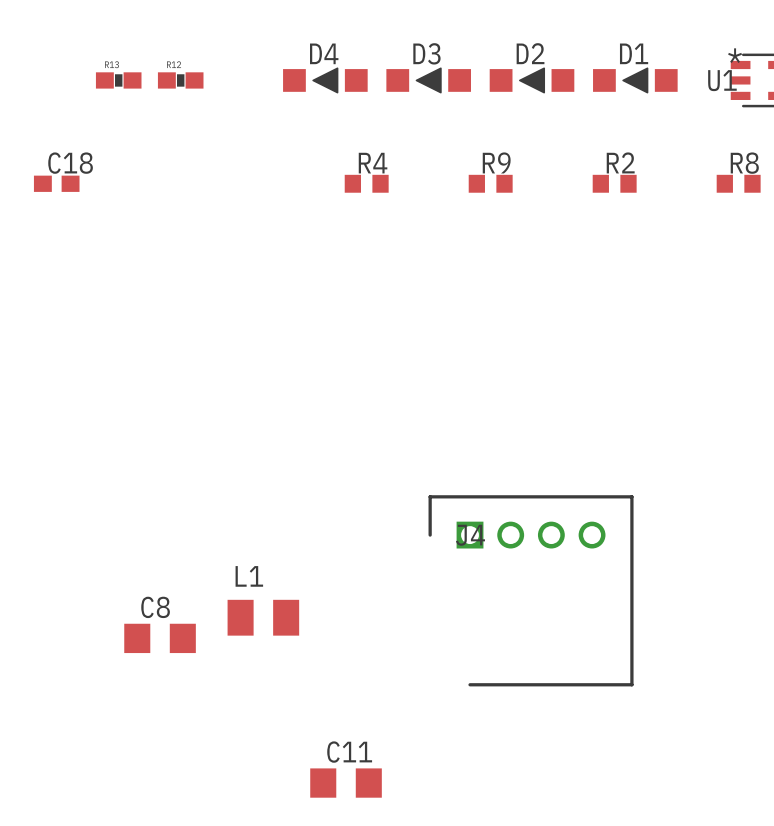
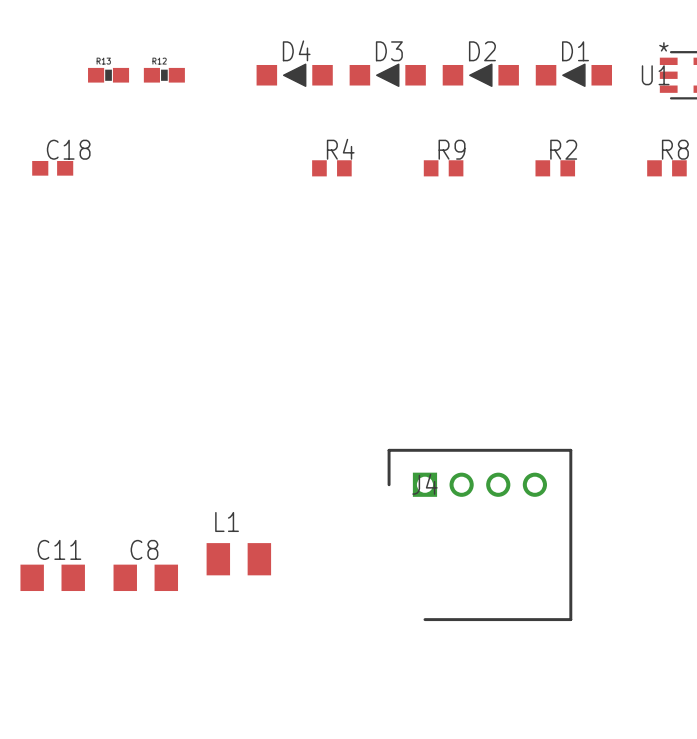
C11 position: (346, 783) -> (52, 577)

